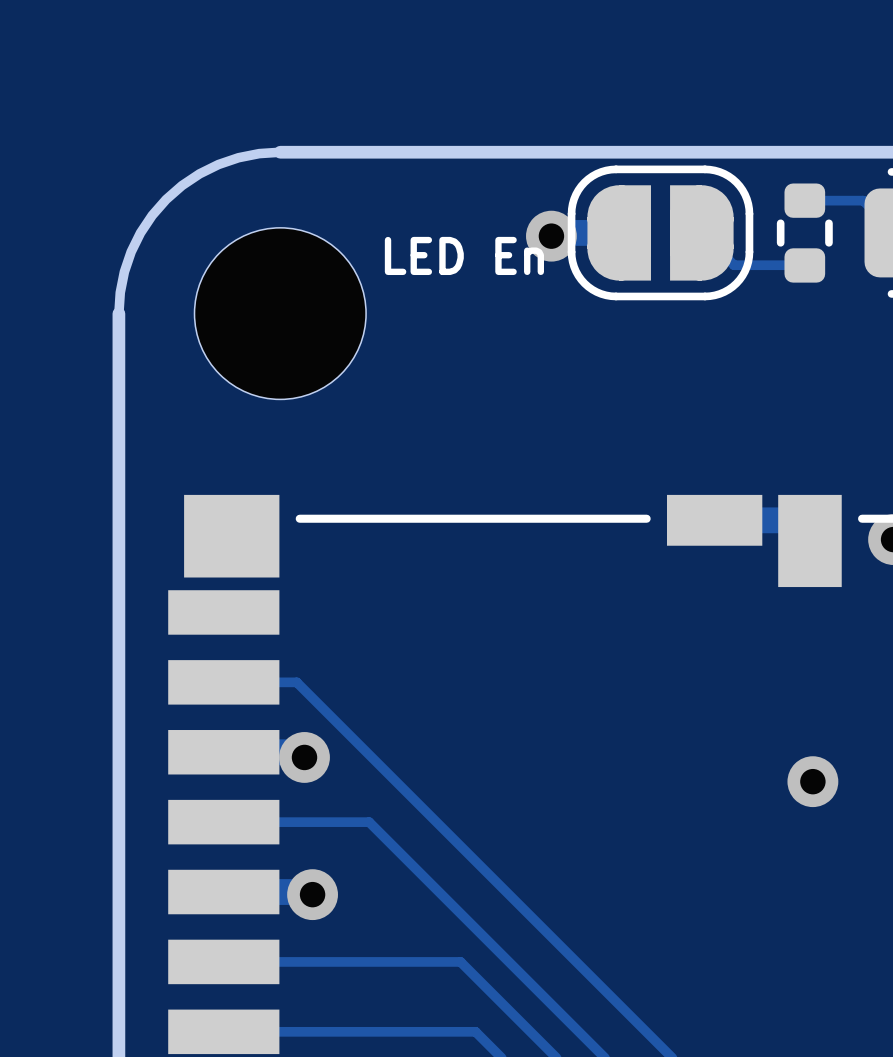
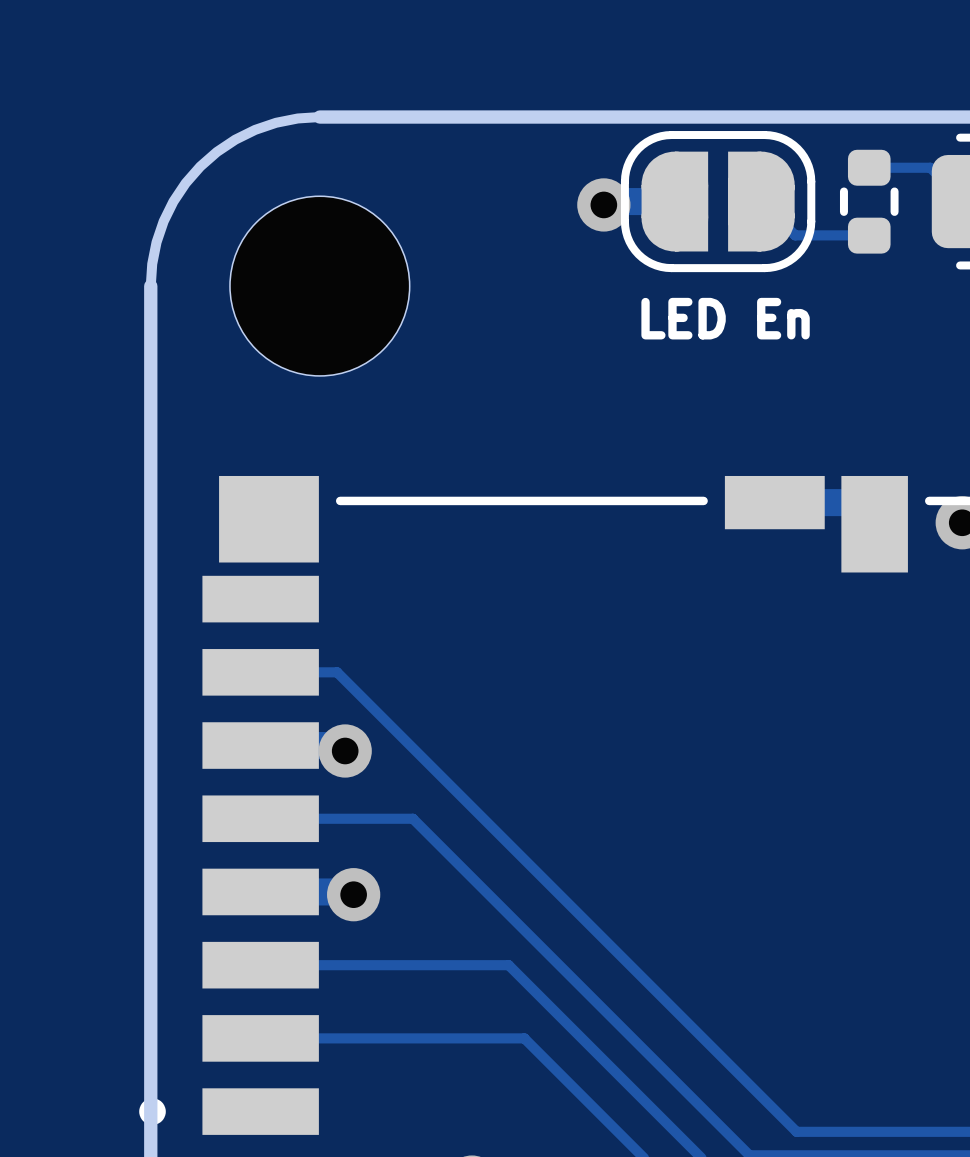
part value position: LED En (464, 255) -> LED En (725, 318)
via: (812, 781) -> none

